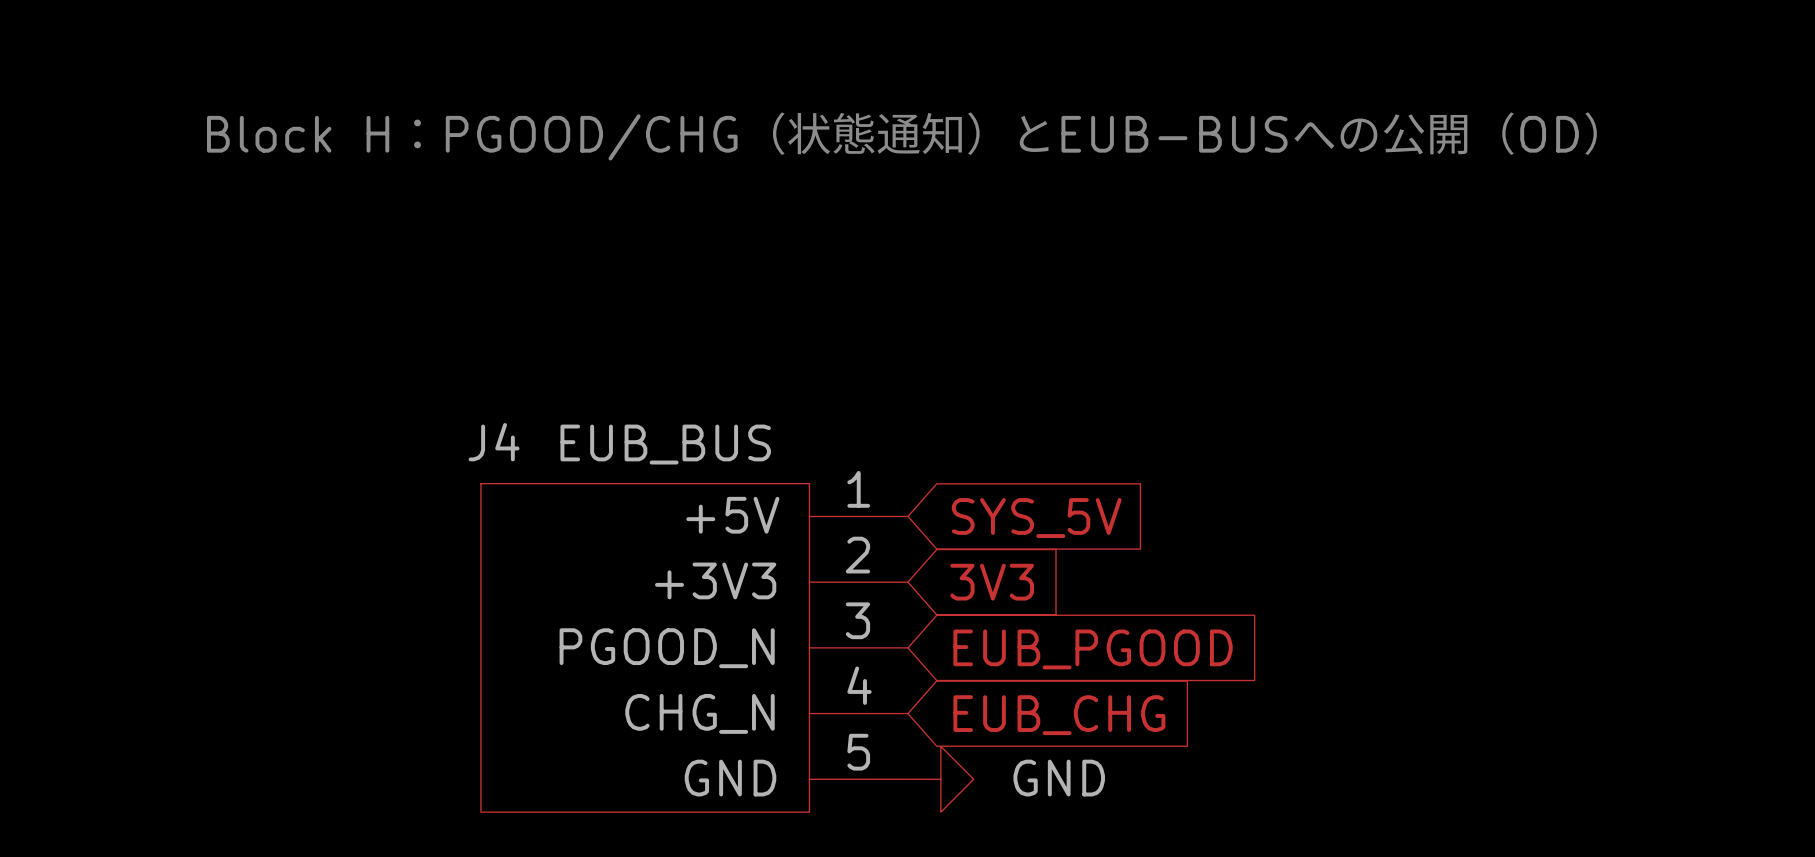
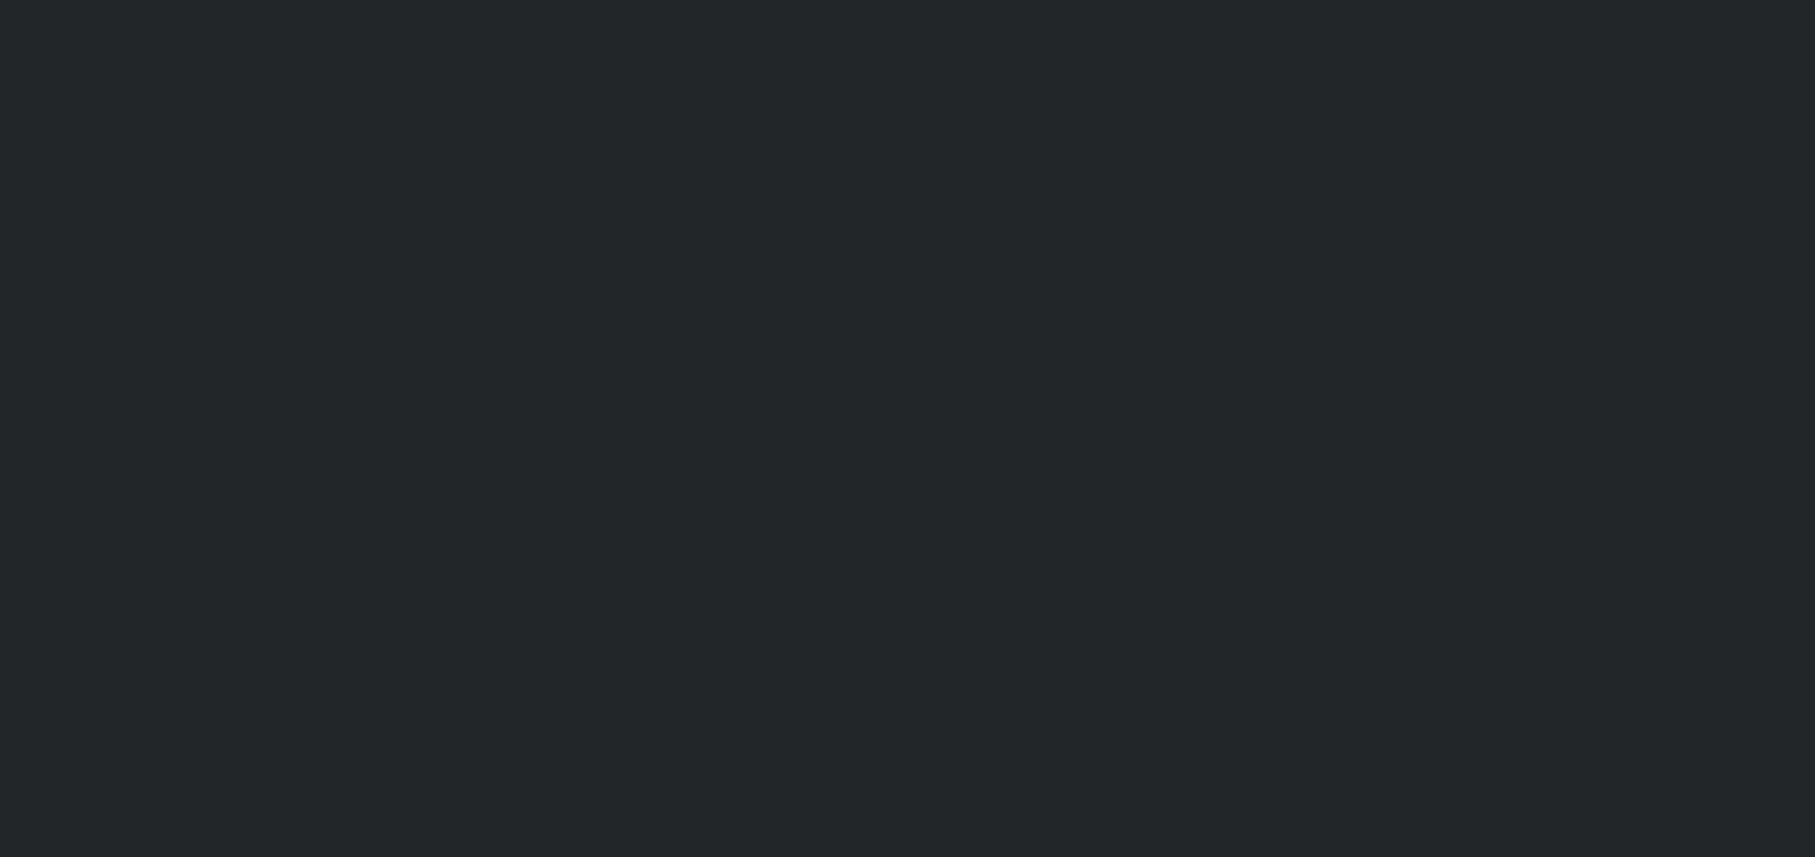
text: Block H：PGOOD/CHG（状態通知）とEUB-BUSへの公開（OD） (902, 135) -> none
global label: SYS_5V (1036, 518) -> none
global label: 3V3 (992, 582) -> none
J4: EUB_BUS (694, 647) -> none
global label: EUB_PGOOD (1093, 649) -> none
global label: EUB_CHG (1059, 715) -> none
power symbol: GND (940, 779) -> none

